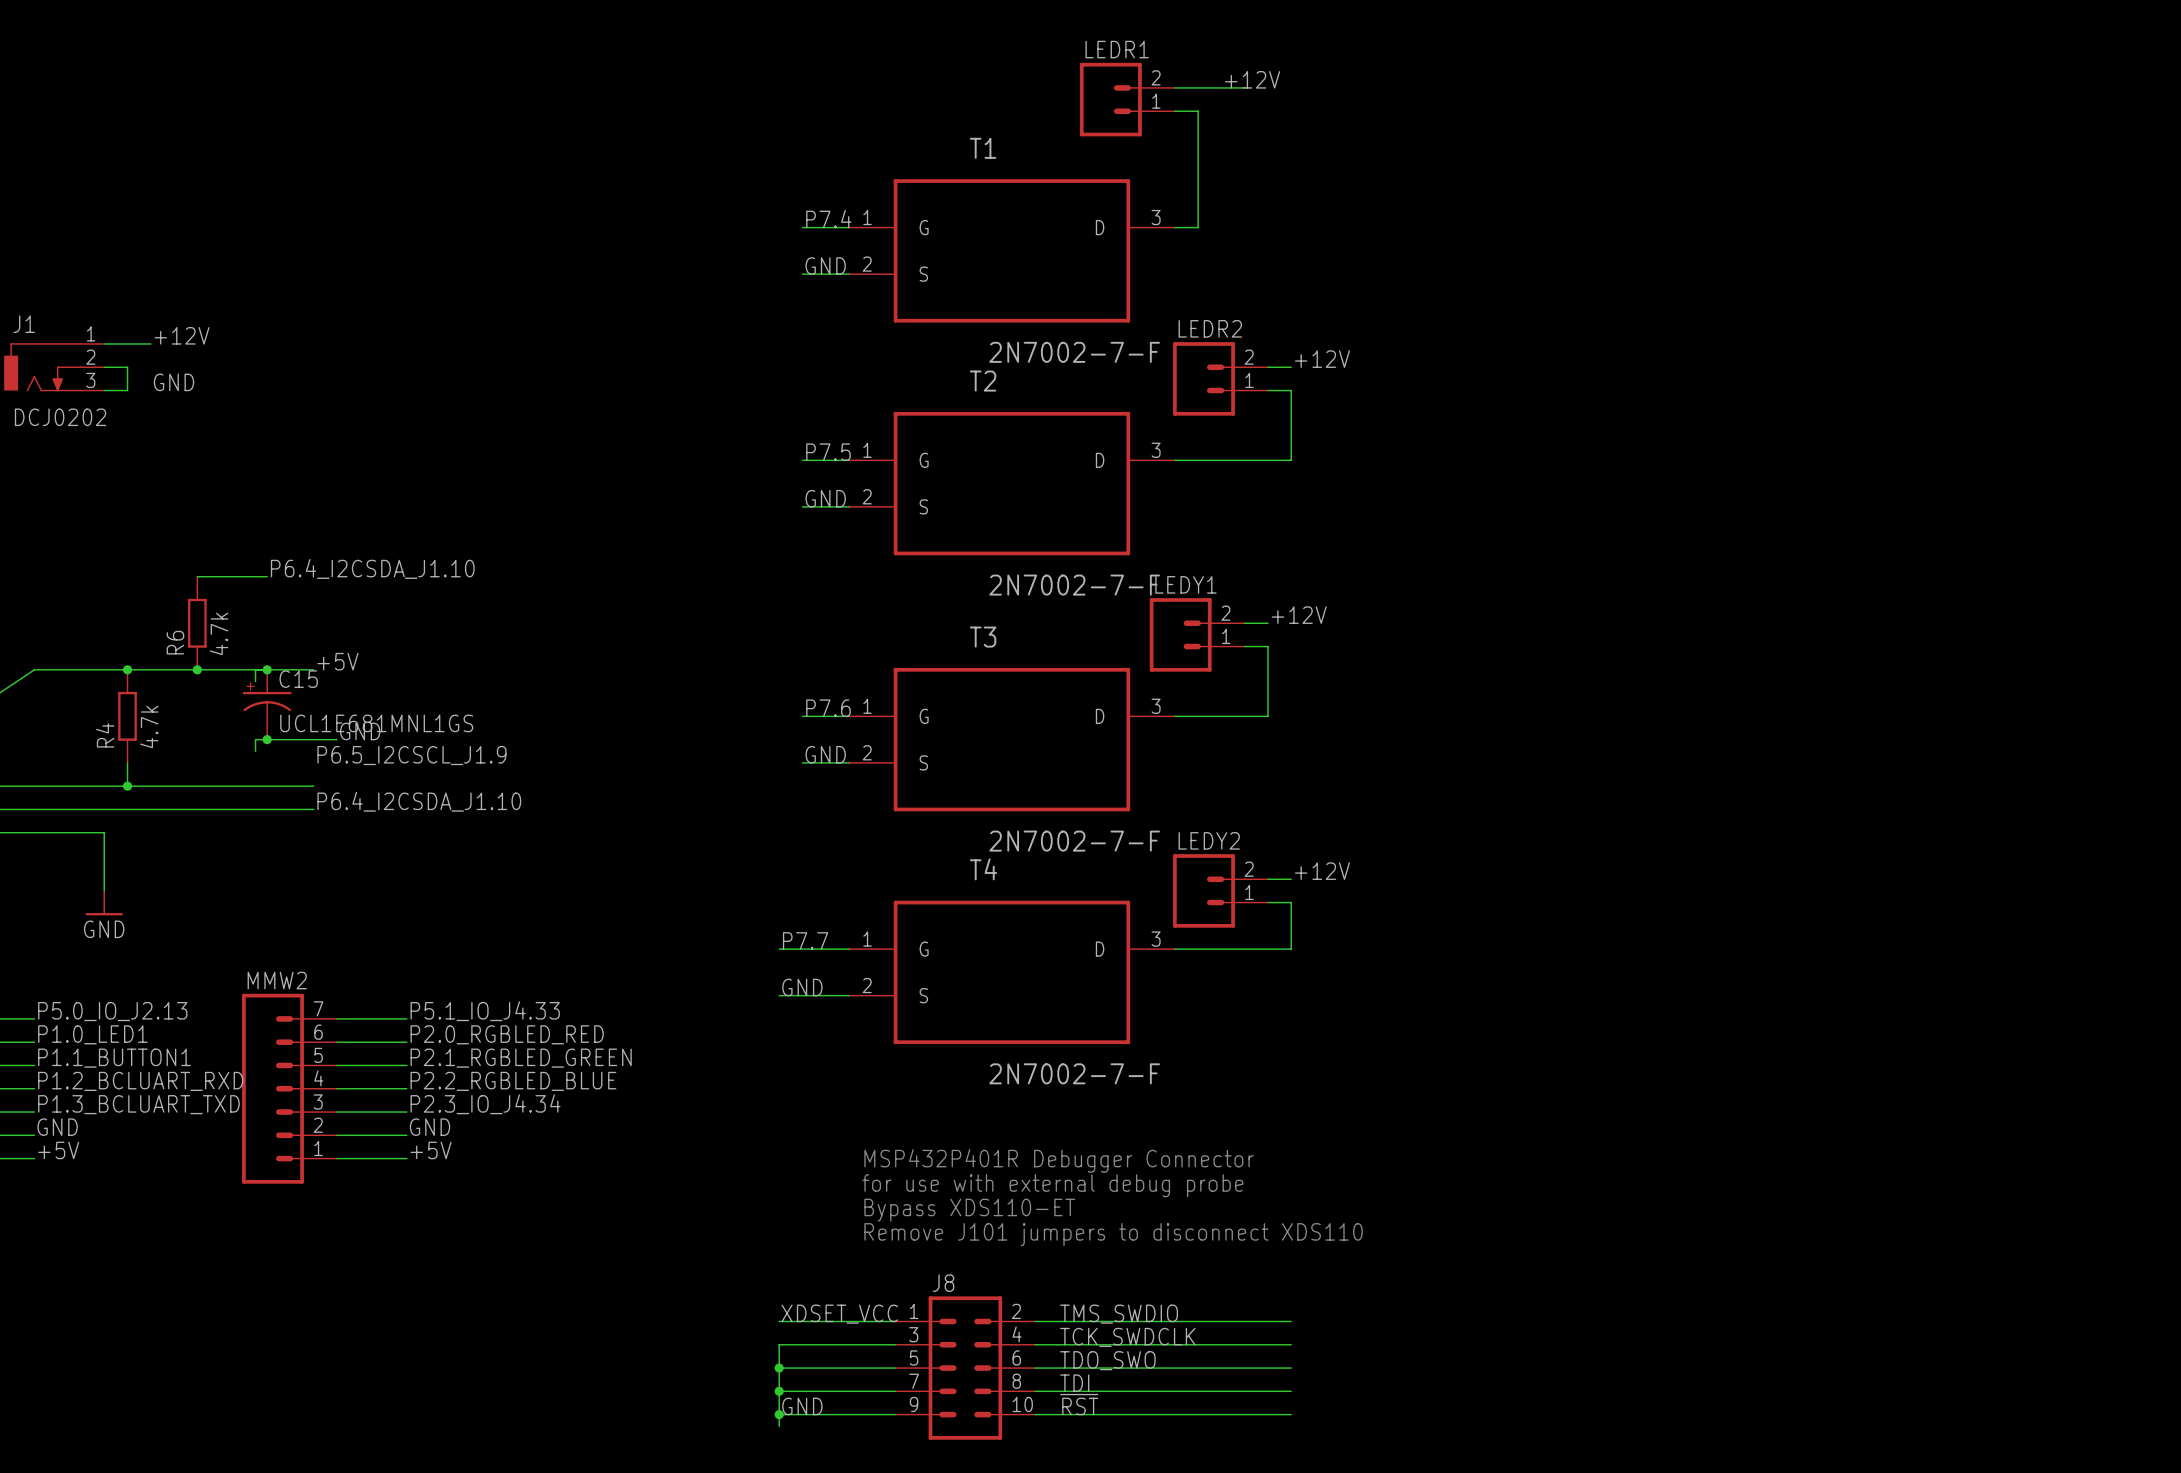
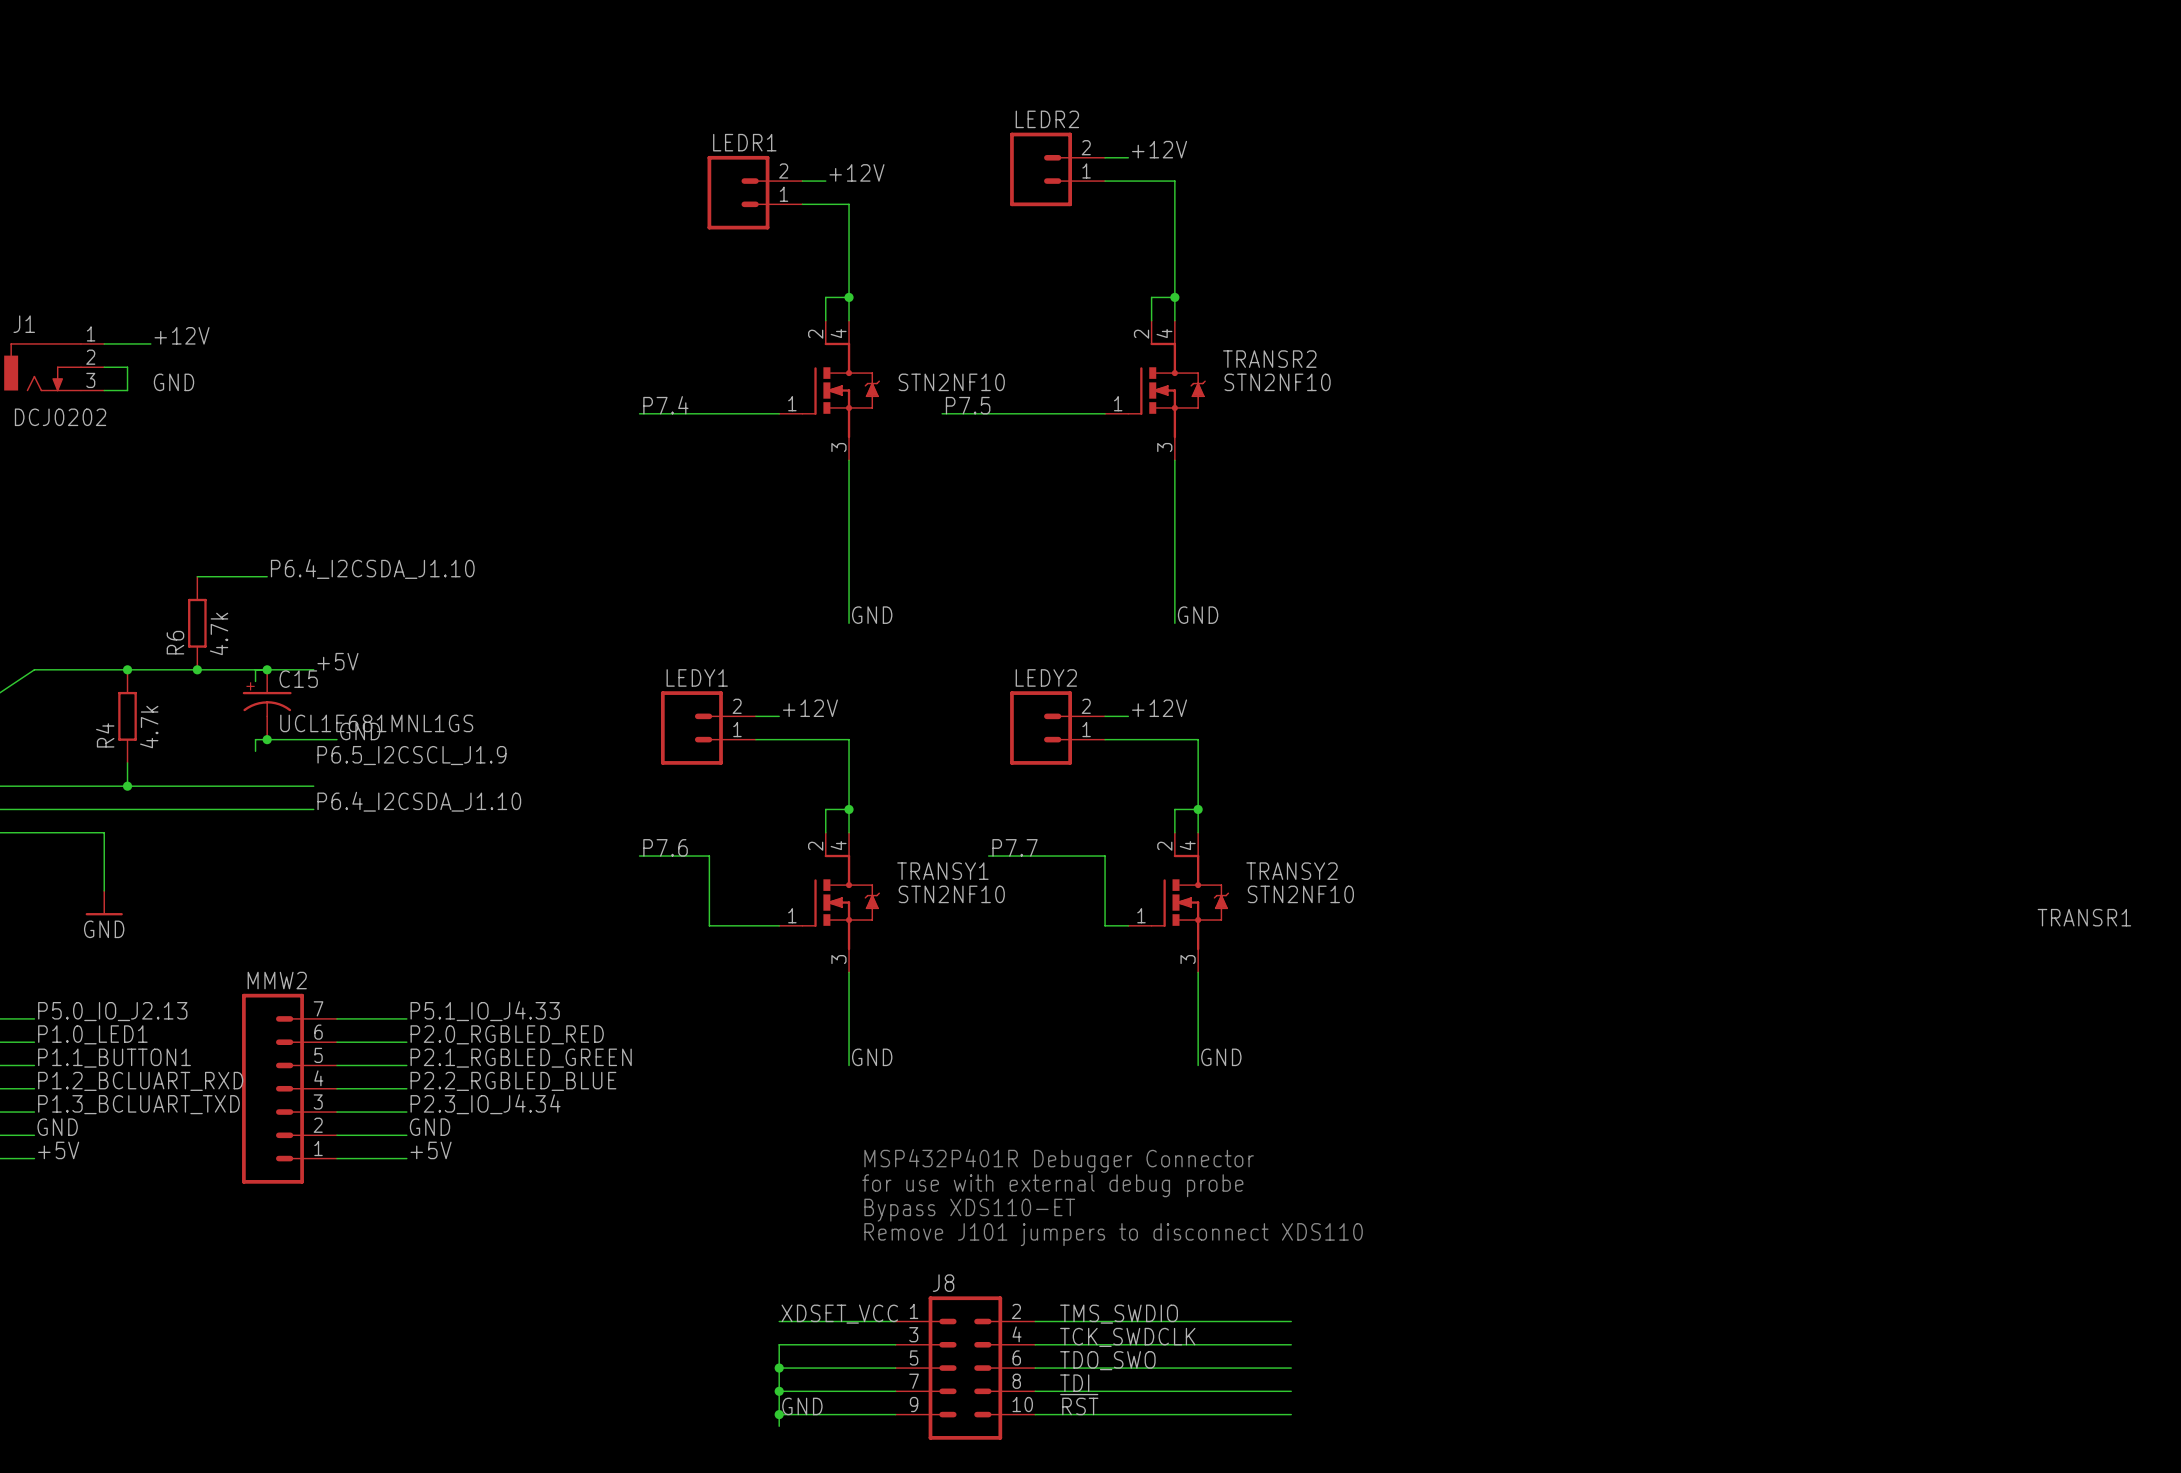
label position: +12V (1252, 79) -> +12V (1159, 149)
wire: (1174, 87) (1244, 87) -> none
LEDR1 position: (1127, 99) -> (755, 192)
wire: (1174, 111) (1198, 111) (1198, 227) (1174, 227) -> none
wire: none -> (1105, 157) (1128, 157)
label: none -> +12V (856, 172)
wire: none -> (802, 181) (825, 181)
wire: none -> (1105, 181) (1174, 181) (1174, 320)
wire: none -> (802, 204) (849, 204) (849, 320)
label: P7.4 (828, 219) -> none
wire: (802, 227) (849, 227) -> none
T1: 2N7002-7-F (1011, 250) -> none
label: GND (825, 266) -> none
wire: (802, 274) (849, 274) -> none
wire: none -> (849, 297) (825, 297) (825, 320)
junction: none -> (849, 297)
wire: none -> (1174, 297) (1151, 297) (1151, 320)
junction: none -> (1174, 297)
label: +12V (1322, 359) -> none
wire: (1267, 367) (1291, 367) -> none
LEDR2 position: (1220, 378) -> (1057, 169)
TRANSR1: none -> STN2NF10 (829, 390)
TRANSR2: none -> STN2NF10 (1155, 390)
wire: (1267, 390) (1291, 390) (1291, 460) (1174, 460) -> (1174, 623) (1174, 460)
label: none -> P7.4 (665, 405)
wire: none -> (639, 413) (779, 413)
label position: P7.5 (828, 452) -> P7.5 (968, 405)
wire: (802, 460) (849, 460) -> (849, 623) (849, 460)
T2: 2N7002-7-F (1011, 483) -> none
label: GND (825, 498) -> none
wire: (802, 506) (849, 506) -> none
label: none -> GND (872, 615)
label: none -> GND (1198, 615)
label: +12V (1299, 615) -> none
wire: (1244, 623) (1267, 623) -> (1105, 716) (1128, 716)
LEDY1 position: (1197, 634) -> (708, 728)
wire: (1244, 646) (1267, 646) (1267, 716) (1174, 716) -> none
label: none -> +12V (810, 708)
label position: P7.6 (828, 708) -> P7.6 (665, 847)
label: none -> +12V (1159, 708)
wire: none -> (755, 716) (779, 716)
wire: (802, 716) (849, 716) -> none
wire: none -> (755, 739) (849, 739) (849, 832)
T3: 2N7002-7-F (1011, 739) -> none
wire: none -> (1105, 739) (1198, 739) (1198, 832)
label: GND (825, 754) -> none
wire: (802, 762) (849, 762) -> none
wire: none -> (849, 809) (825, 809) (825, 832)
junction: none -> (849, 809)
wire: none -> (1198, 809) (1174, 809) (1174, 832)
junction: none -> (1198, 809)
label: none -> P7.7 (1015, 847)
wire: none -> (639, 856) (709, 856) (709, 925) (779, 925)
wire: none -> (988, 856) (1105, 856) (1105, 925) (1128, 925)
label: +12V (1322, 871) -> none
wire: (1267, 879) (1291, 879) -> none
LEDY2 position: (1220, 890) -> (1057, 728)
TRANSY1: none -> STN2NF10 (829, 902)
TRANSY2: none -> STN2NF10 (1178, 902)
wire: (1267, 902) (1291, 902) (1291, 949) (1174, 949) -> none
label: P7.7 (805, 940) -> none
wire: (779, 949) (849, 949) -> none
wire: none -> (849, 972) (849, 1065)
T4: 2N7002-7-F (1011, 972) -> none
wire: none -> (1198, 972) (1198, 1065)
label position: GND (802, 987) -> GND (872, 1057)
wire: (779, 995) (849, 995) -> none
label: none -> GND (1221, 1057)

